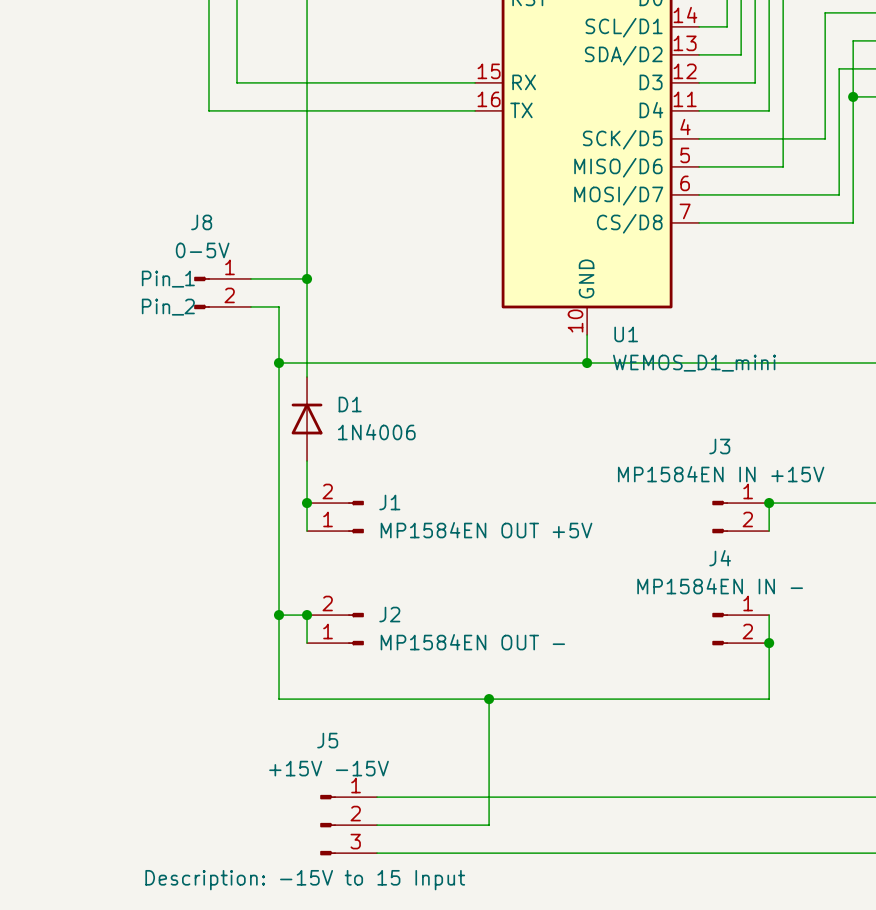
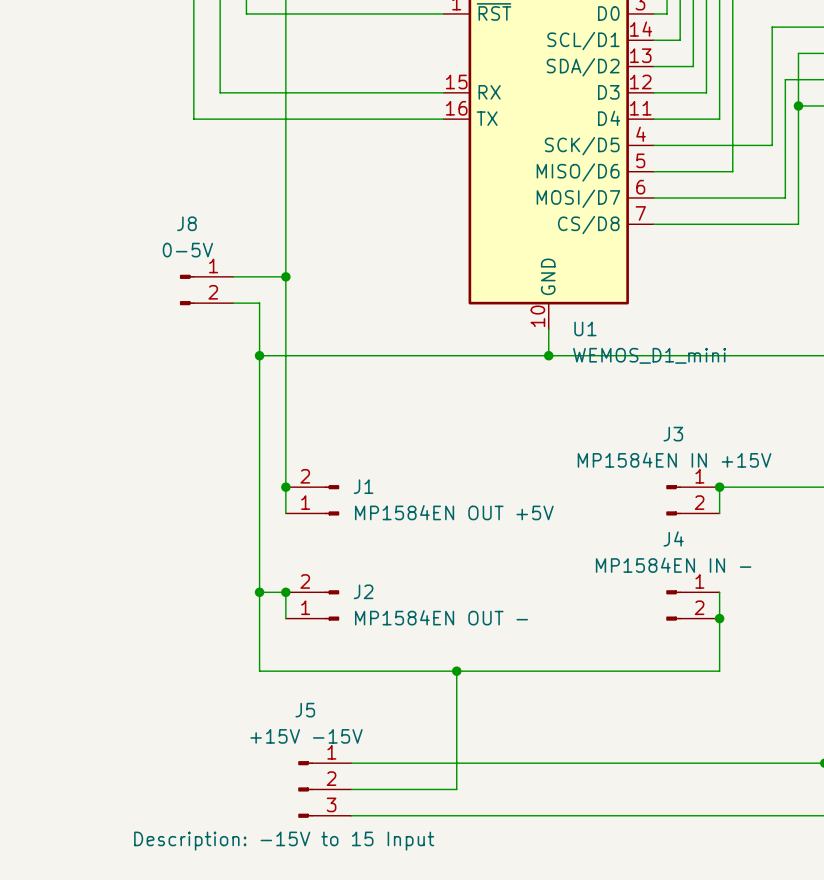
J8 pin name: Pin_1 (168, 279) -> none
J8 pin name: Pin_2 (168, 307) -> none
D1: 1N4006 (307, 419) -> none

